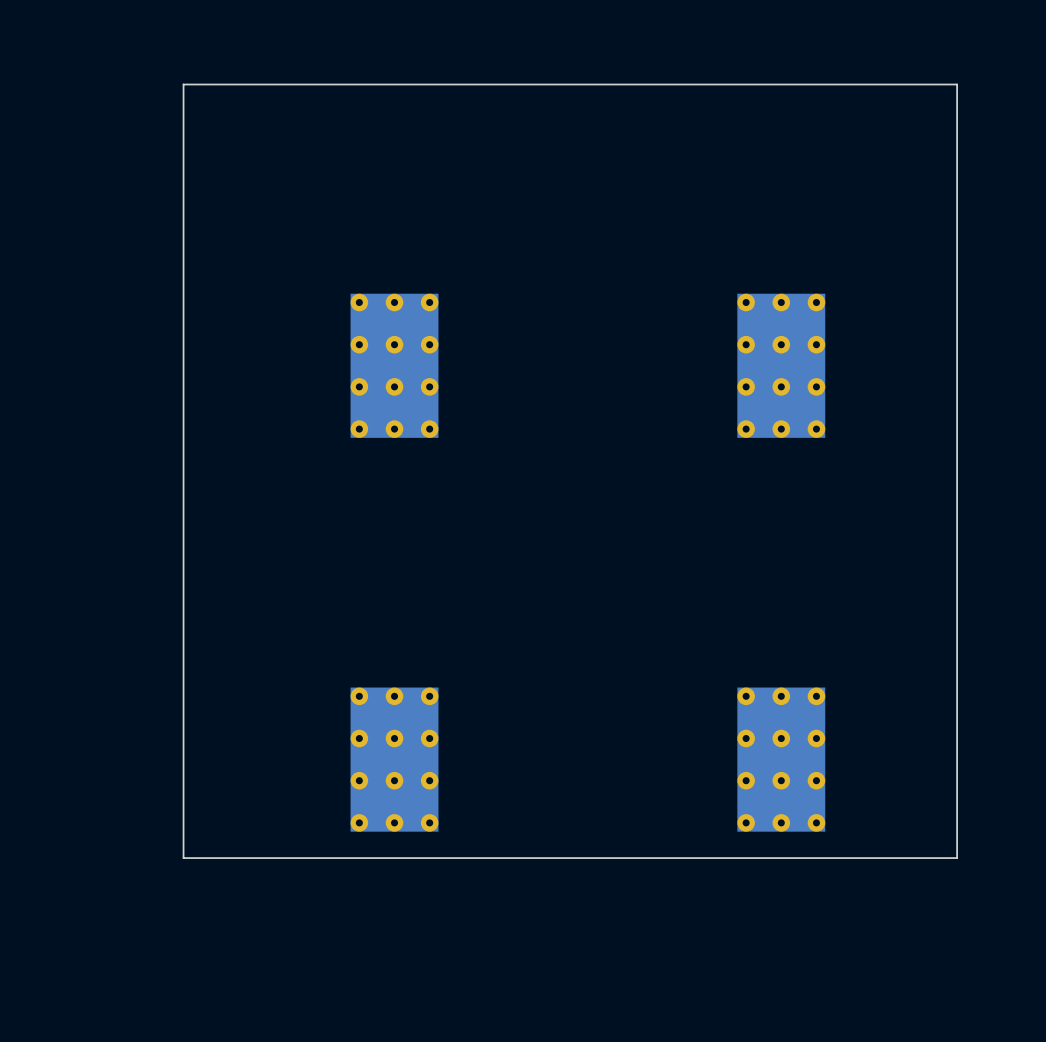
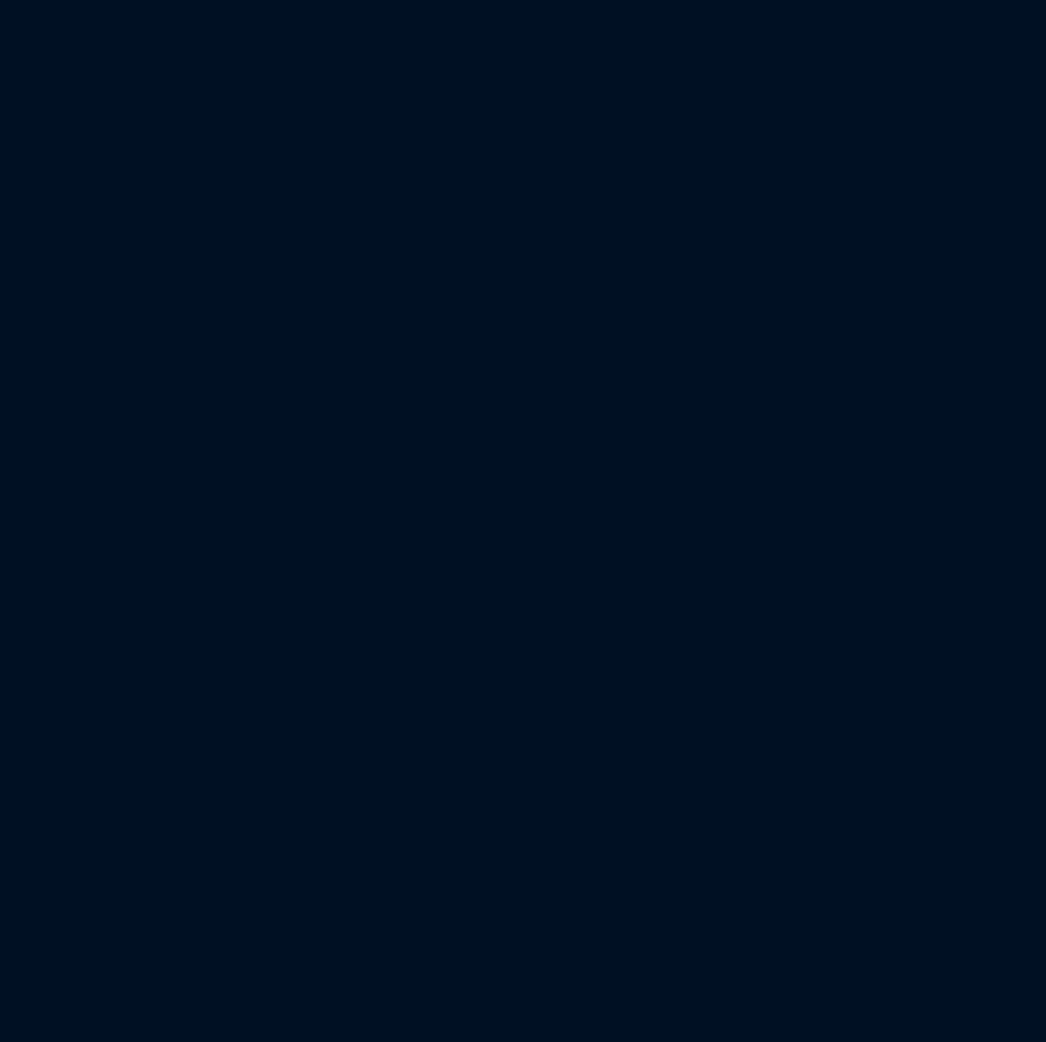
board edge: (957, 84) (183, 84) (183, 858) (957, 858) (957, 84) -> none
part: (394, 365) -> none
part: (781, 365) -> none
part: (394, 759) -> none
part: (781, 759) -> none

